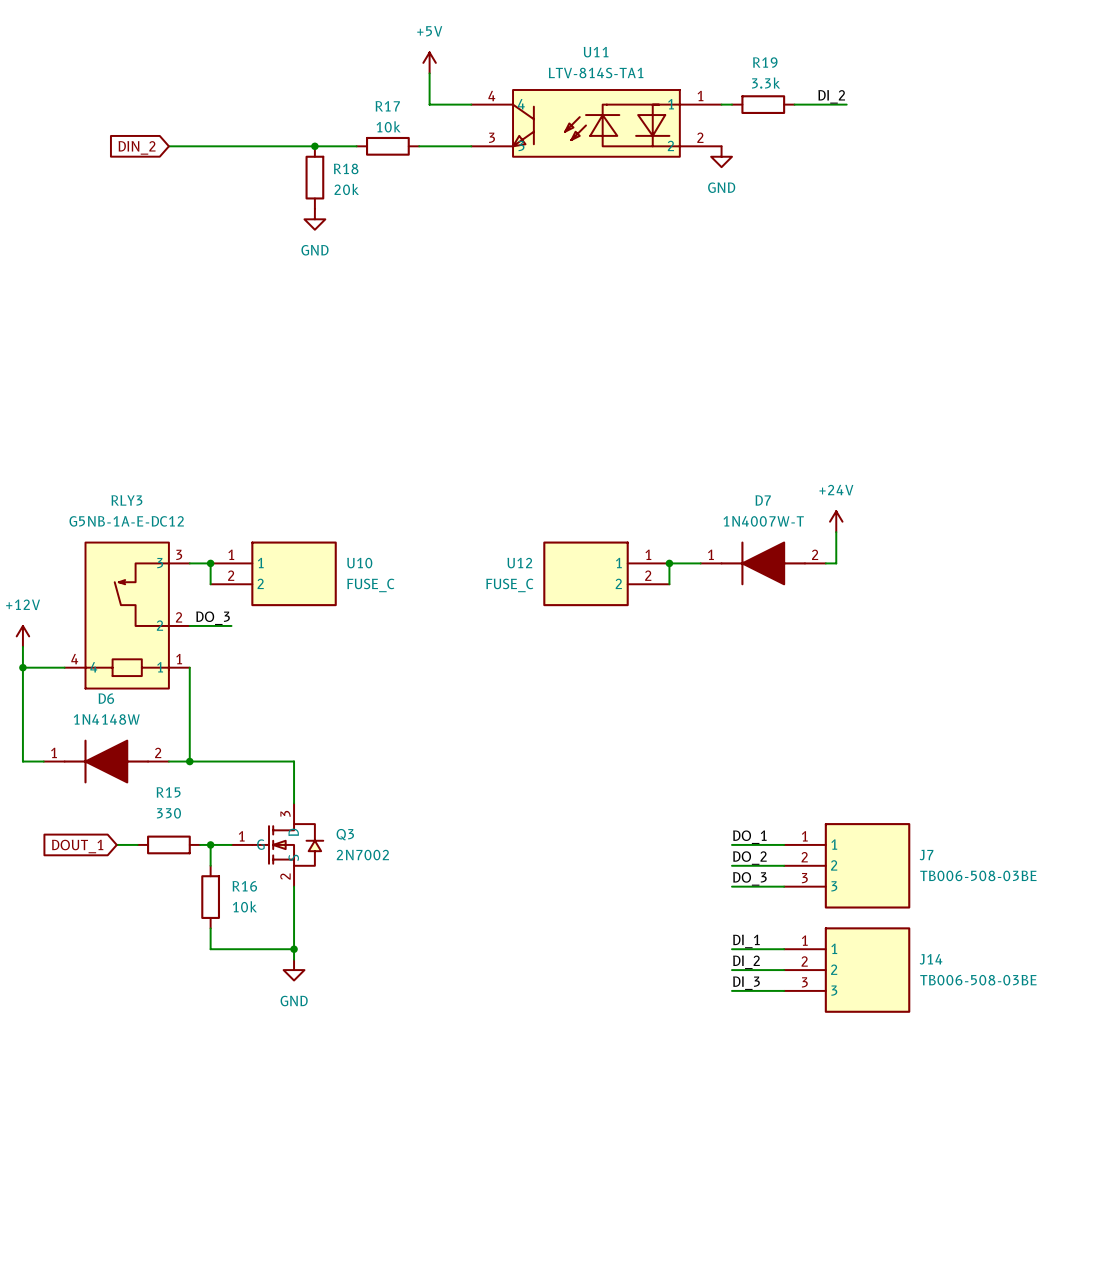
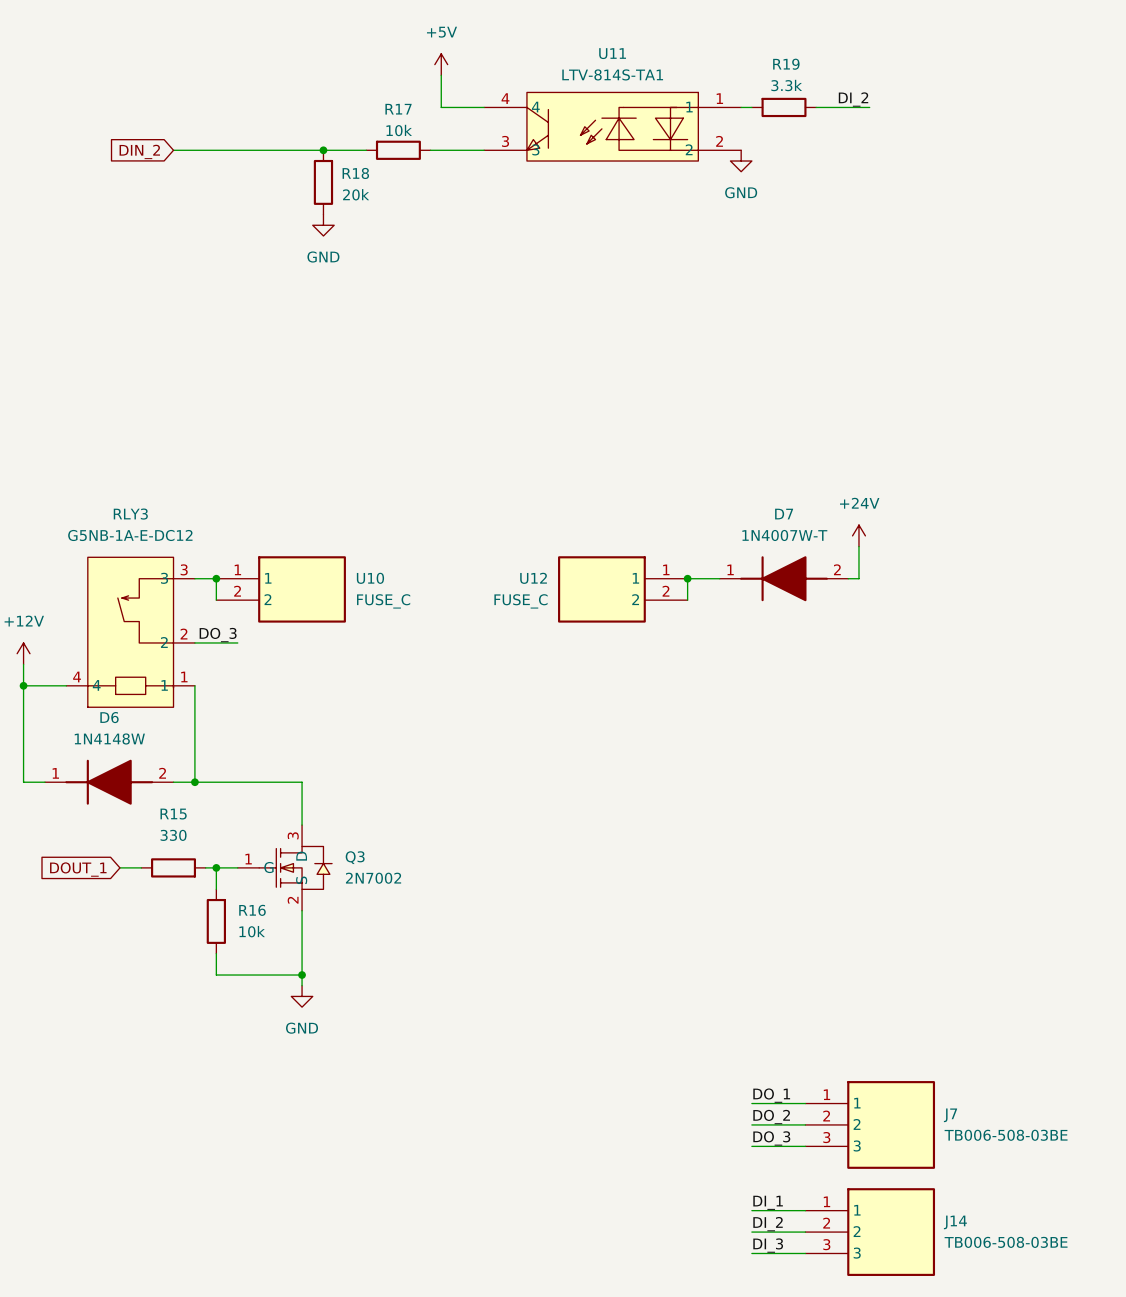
label: DO_1 (749, 837) -> none
wire: (731, 844) (784, 844) -> none
label: DO_2 (749, 858) -> none
wire: (731, 865) (784, 865) -> none
J7 position: (847, 865) -> (870, 1124)
label: DO_3 (749, 878) -> none
wire: (731, 886) (784, 886) -> none
label: DI_1 (746, 941) -> none
wire: (731, 949) (784, 949) -> (751, 1103) (805, 1103)
label: DI_2 (746, 962) -> none
wire: (731, 970) (784, 970) -> (751, 1124) (805, 1124)
J14 position: (847, 970) -> (870, 1232)
label: DI_3 (746, 983) -> none
wire: (731, 990) (784, 990) -> (751, 1146) (805, 1146)
label: none -> DO_1 (771, 1095)
label: none -> DO_2 (771, 1117)
label: none -> DO_3 (771, 1138)
label: none -> DI_1 (768, 1202)
wire: none -> (751, 1210) (805, 1210)
label: none -> DI_2 (768, 1224)
wire: none -> (751, 1232) (805, 1232)
label: none -> DI_3 (768, 1245)
wire: none -> (751, 1253) (805, 1253)

